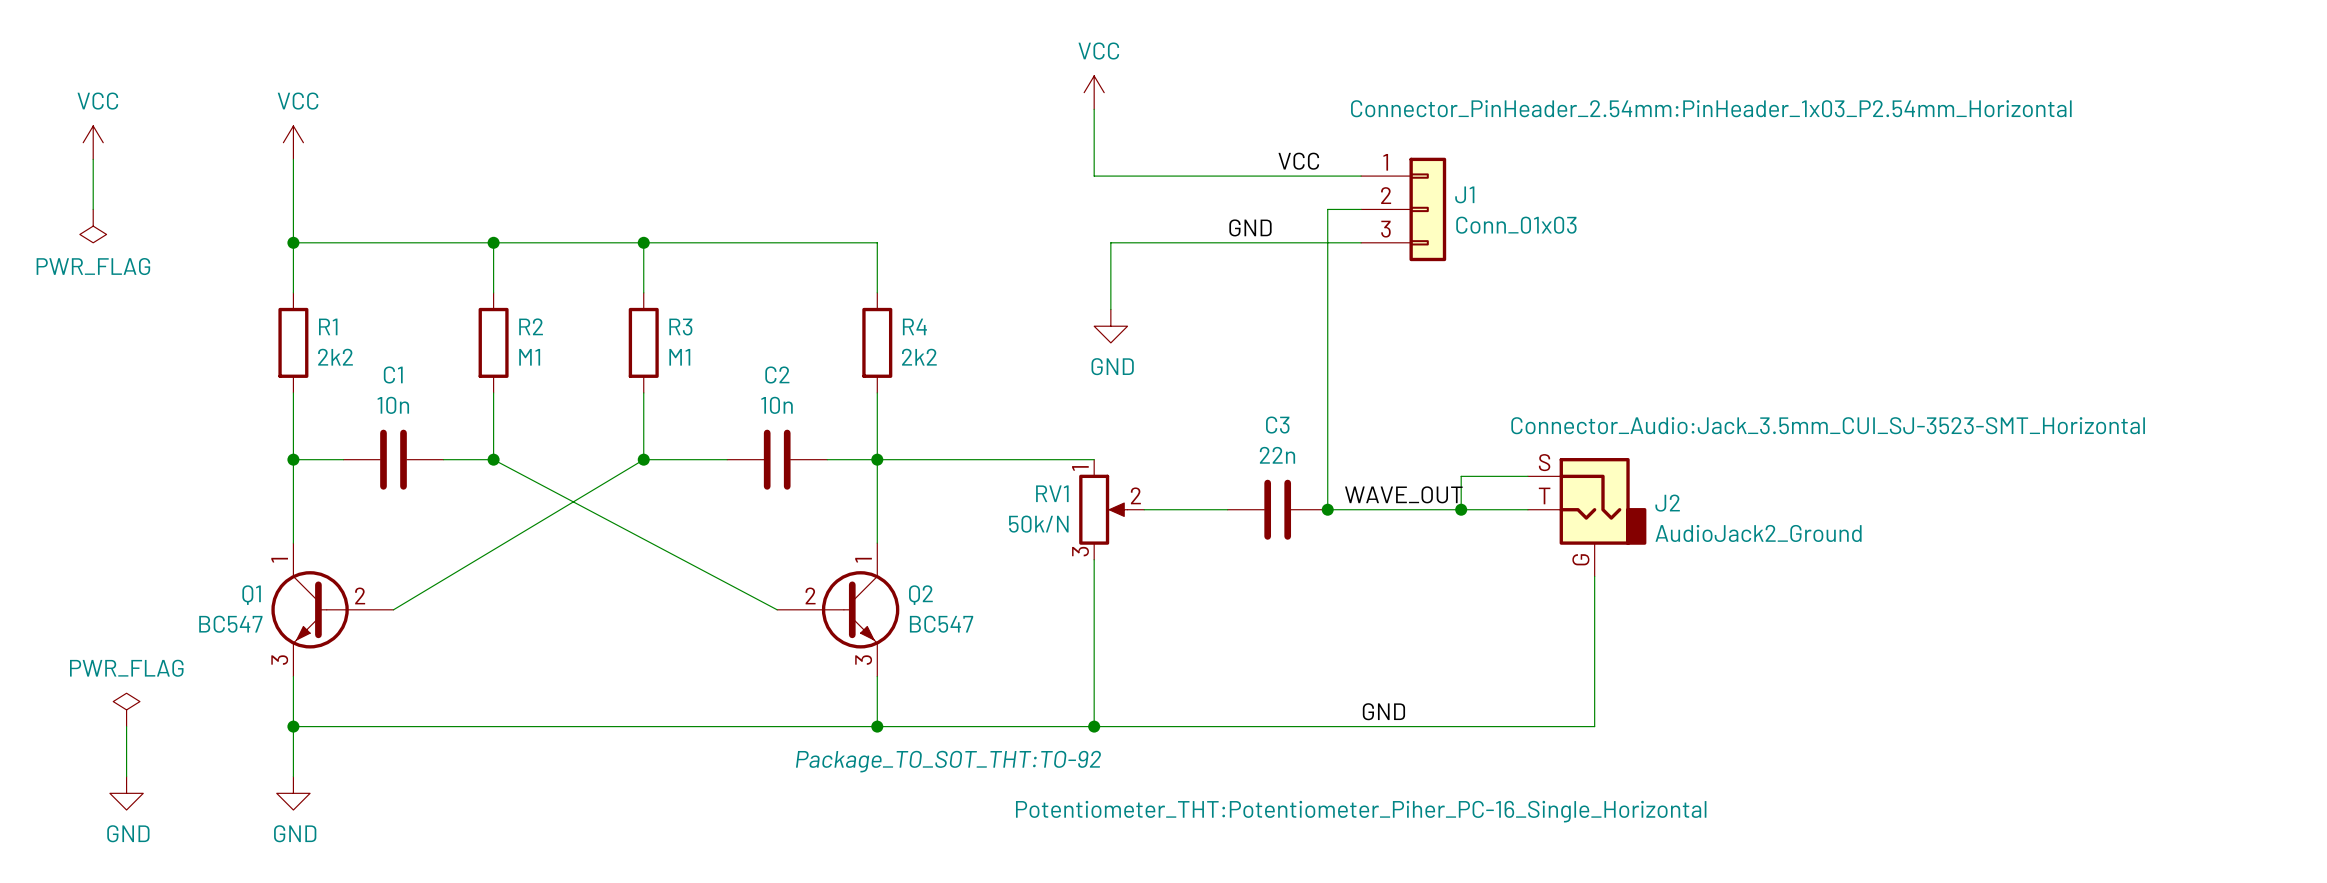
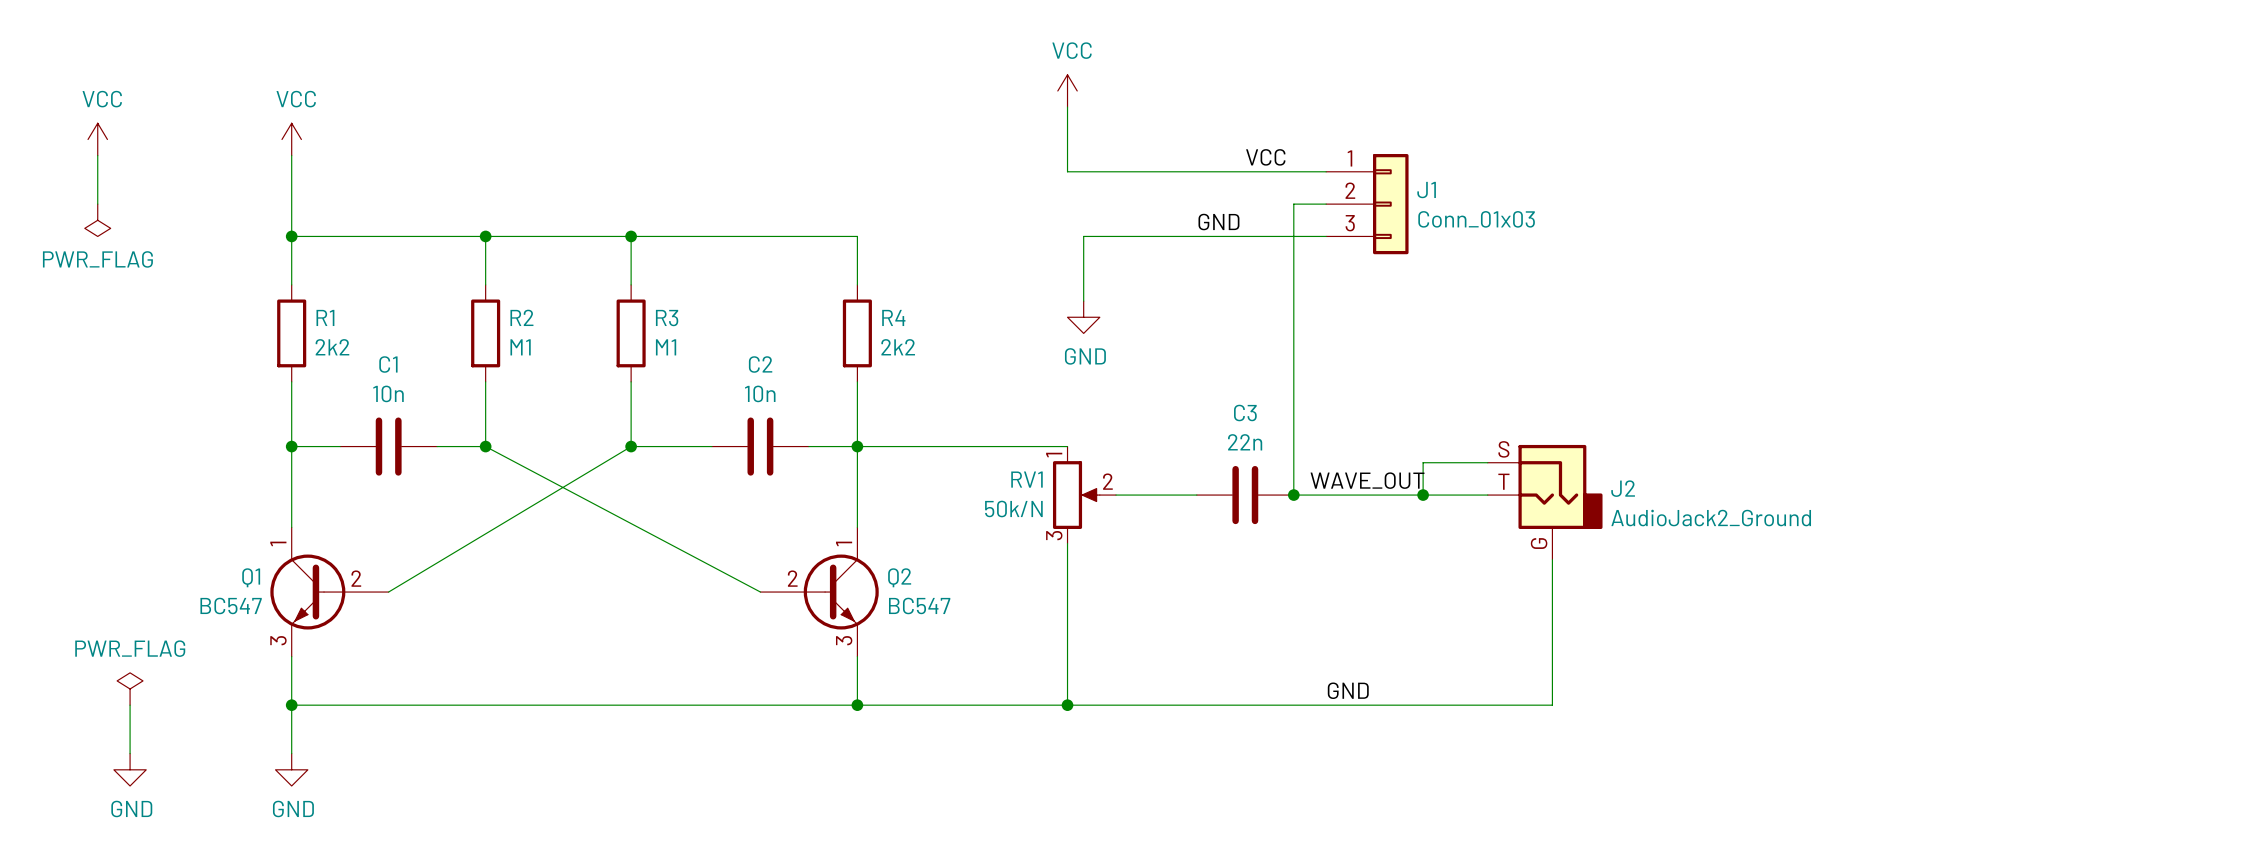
J1 text: Connector_PinHeader_2.54mm:PinHeader_1x03_P2.54mm_Horizontal (1711, 108) -> none
J2 text: Connector_Audio:Jack_3.5mm_CUI_SJ-3523-SMT_Horizontal (1828, 425) -> none
Q2 text: Package_TO_SOT_THT:TO-92 (948, 761) -> none
RV1 text: Potentiometer_THT:Potentiometer_Piher_PC-16_Single_Horizontal (1361, 811) -> none

